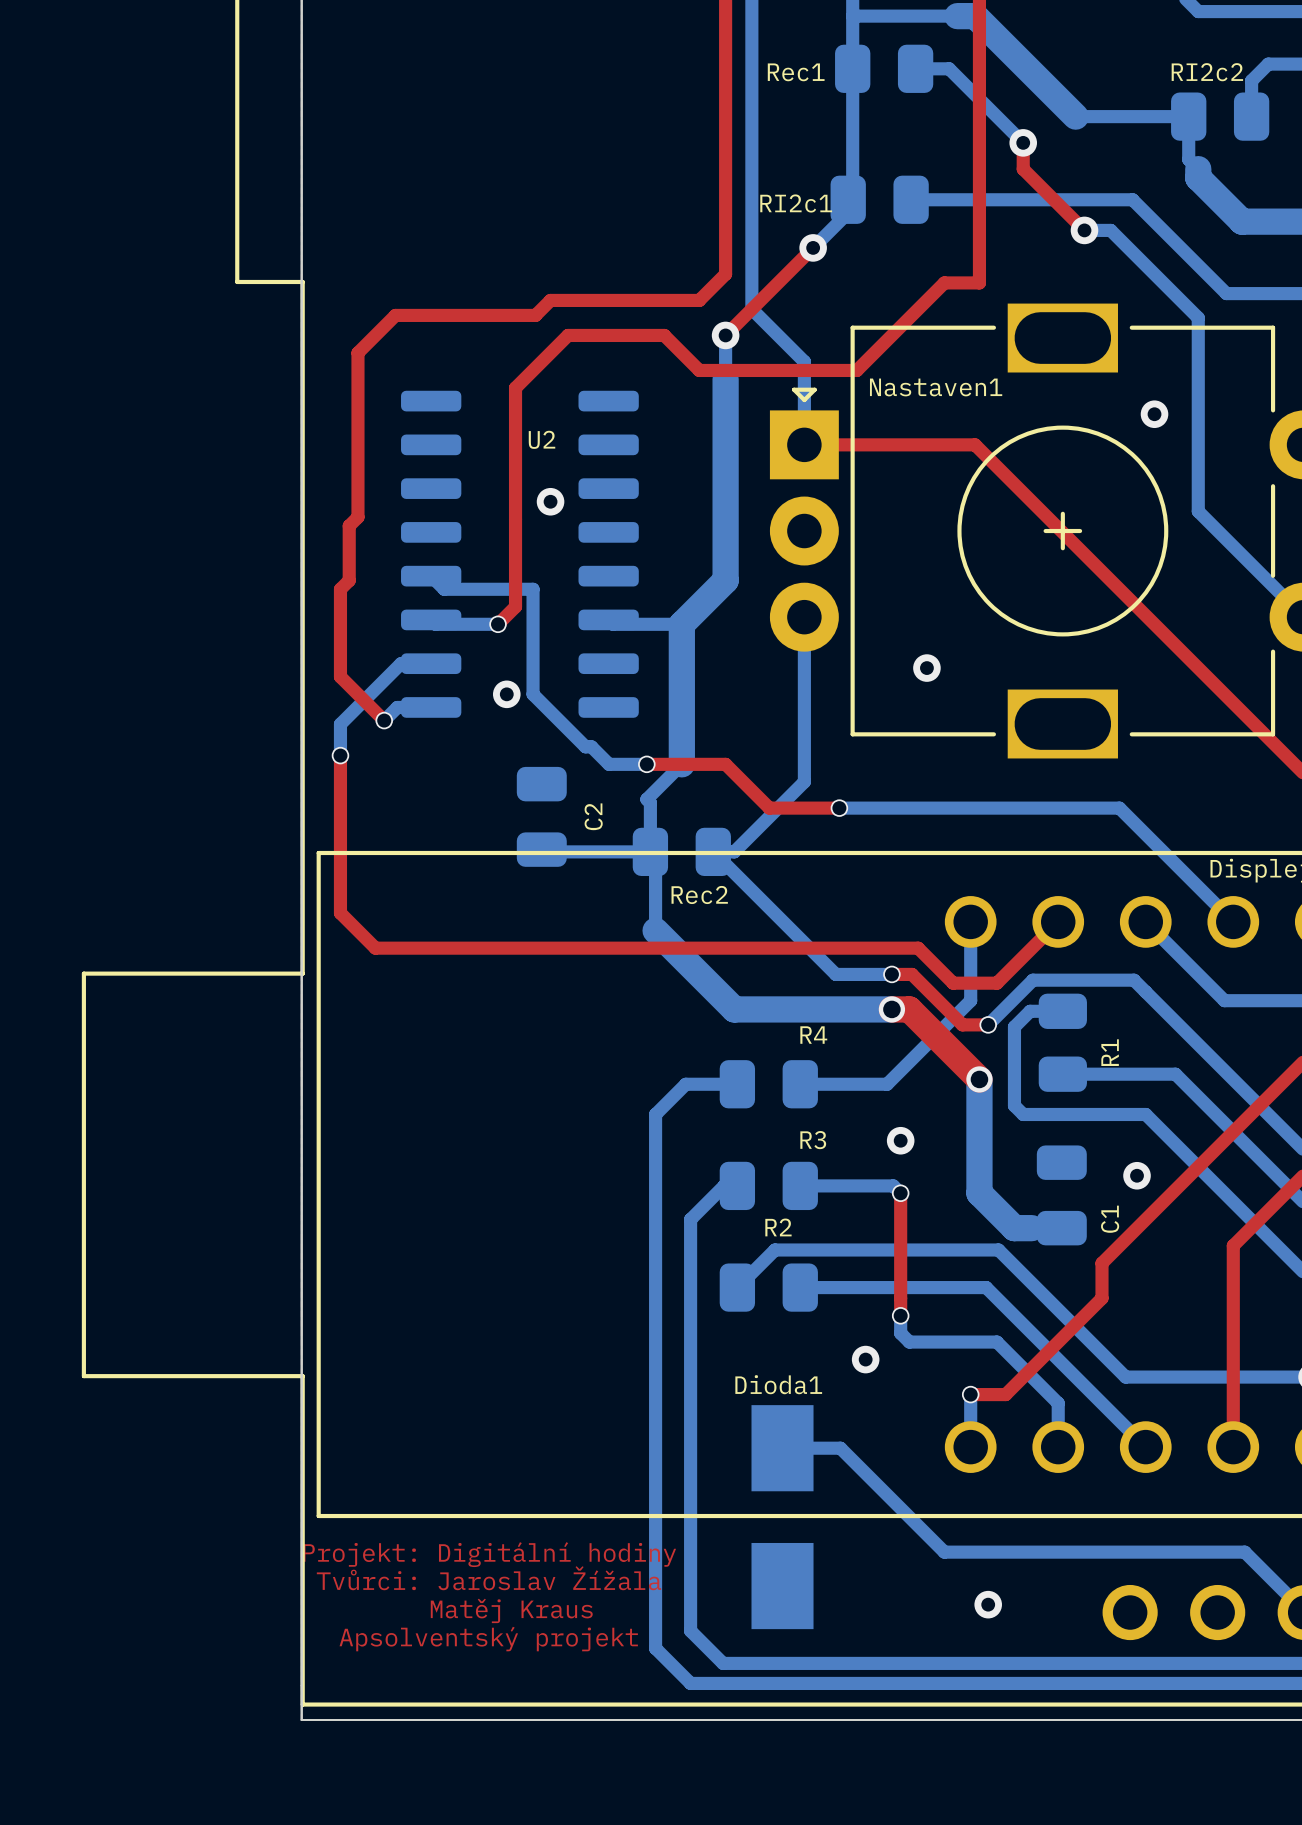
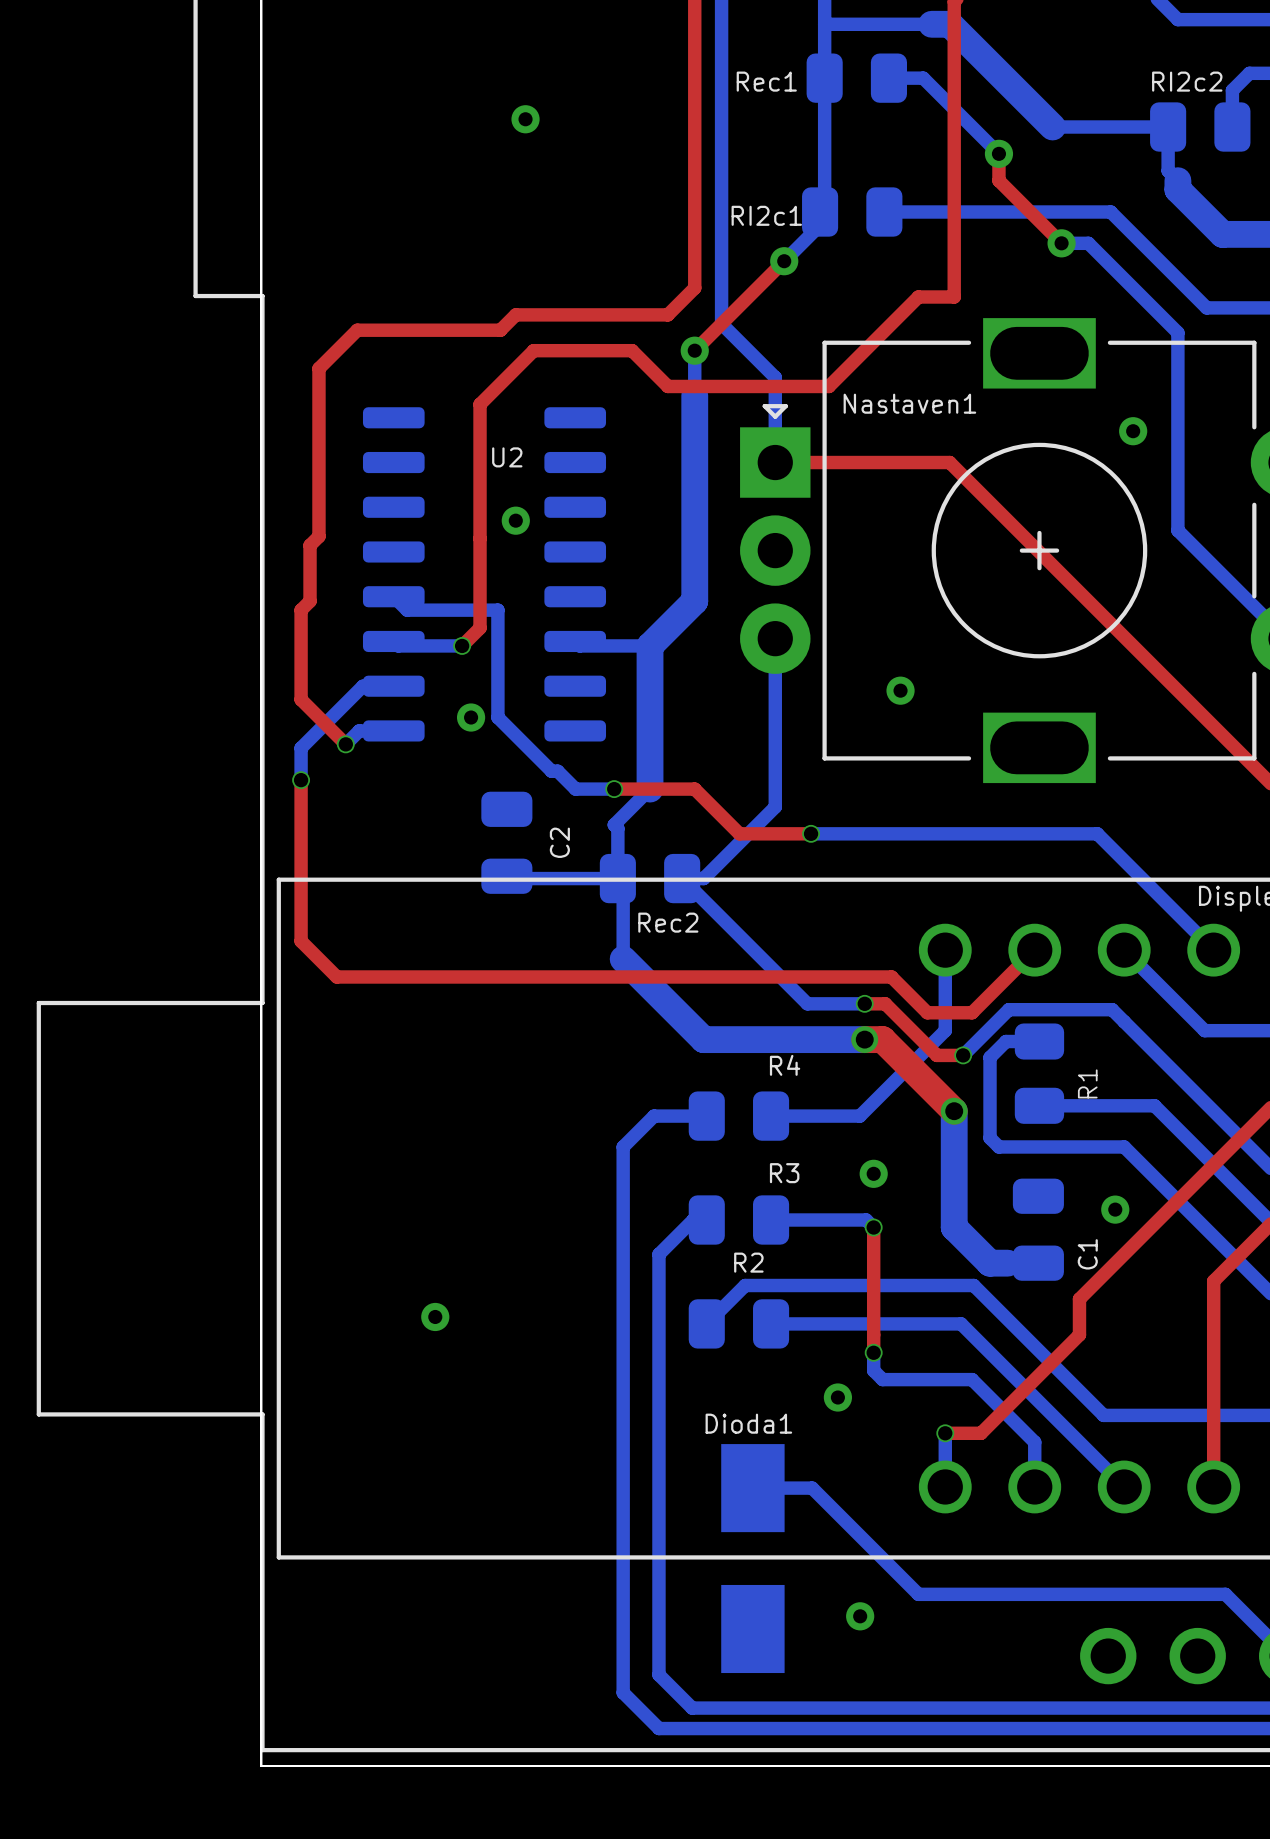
via: none -> (525, 119)
via: none -> (435, 1316)
text: Projekt: Digitální hodiny (489, 1554) -> none
text: Tvůrci: Jaroslav Žížala (488, 1578) -> none
via position: (988, 1604) -> (860, 1616)
text: Matěj Kraus (511, 1610) -> none
text: Apsolventský projekt (488, 1639) -> none

